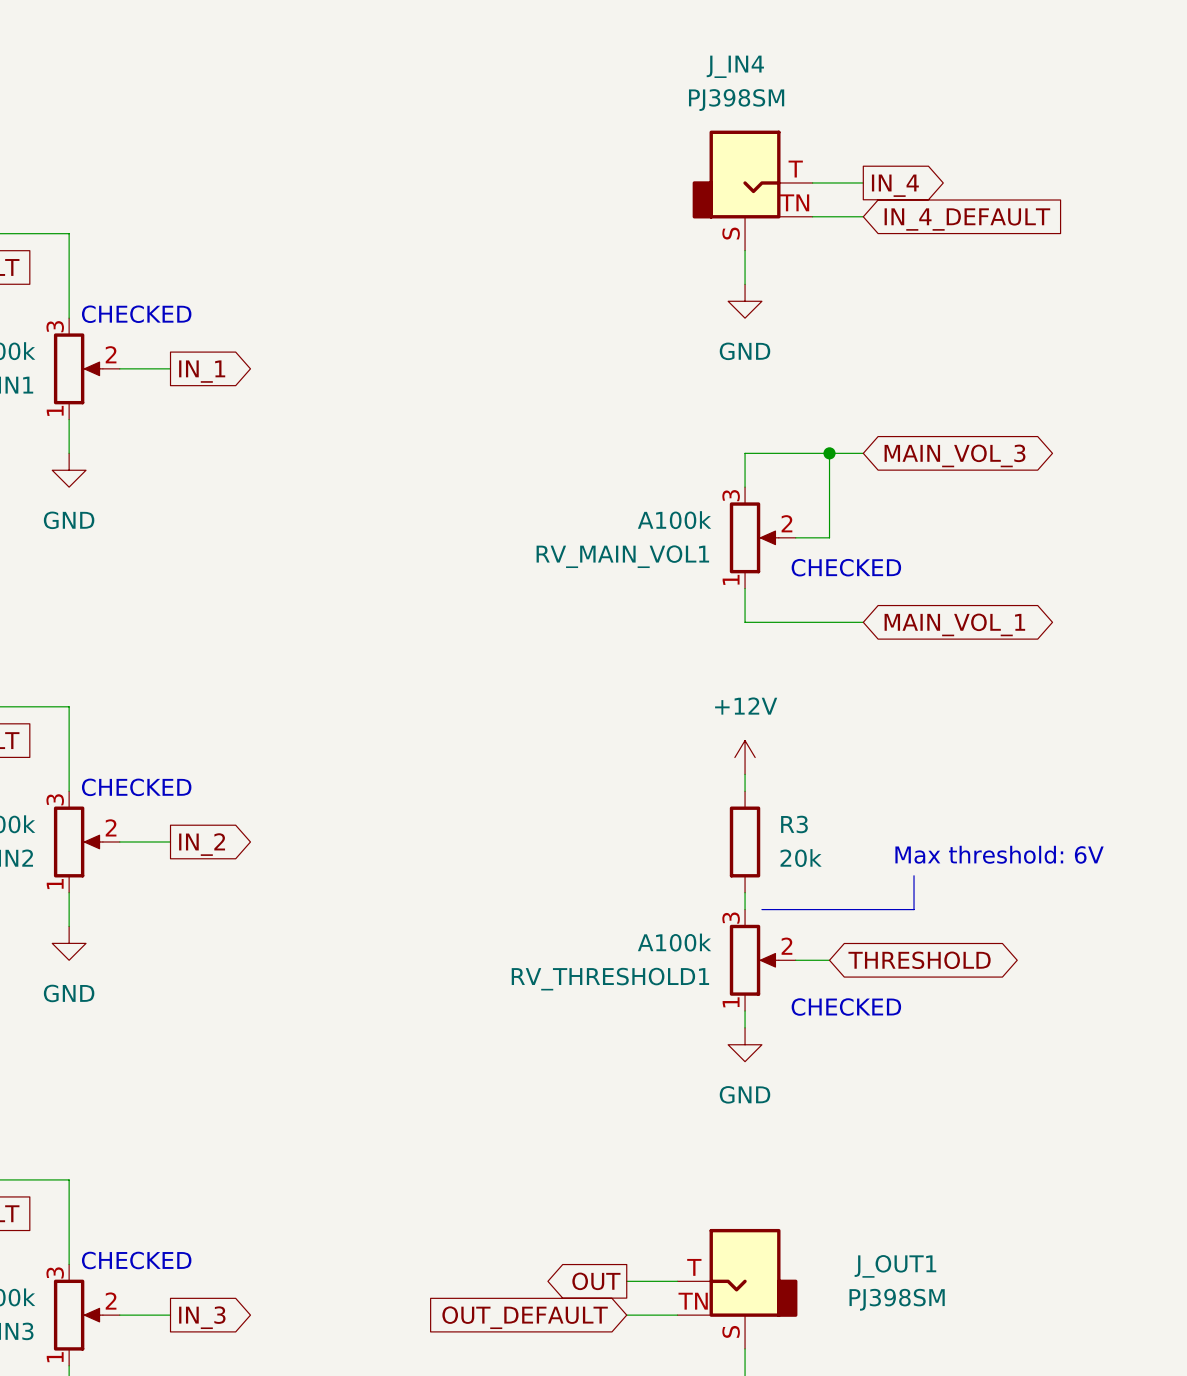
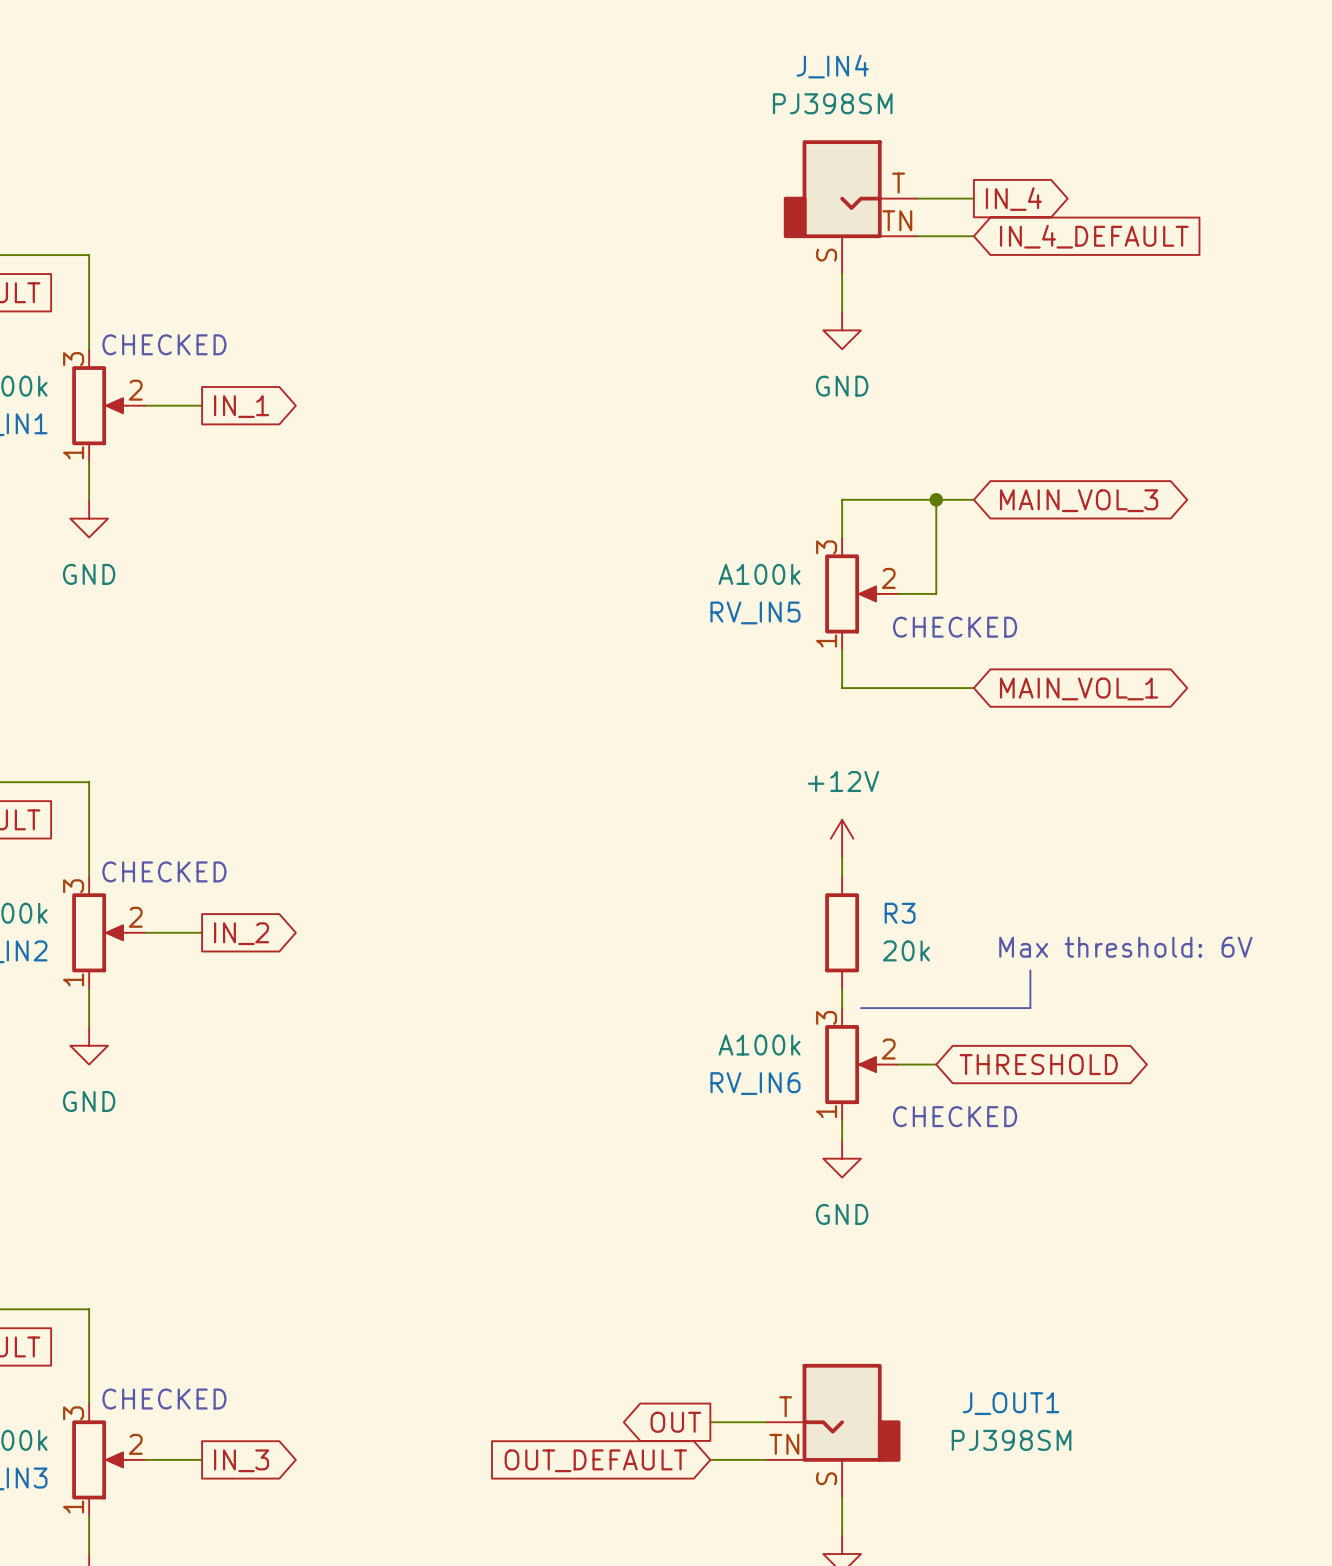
RV_MAIN_VOL1 name: RV_MAIN_VOL1 (622, 556) -> RV_IN5 (755, 612)
RV_THRESHOLD1 name: RV_THRESHOLD1 (610, 979) -> RV_IN6 (755, 1083)

